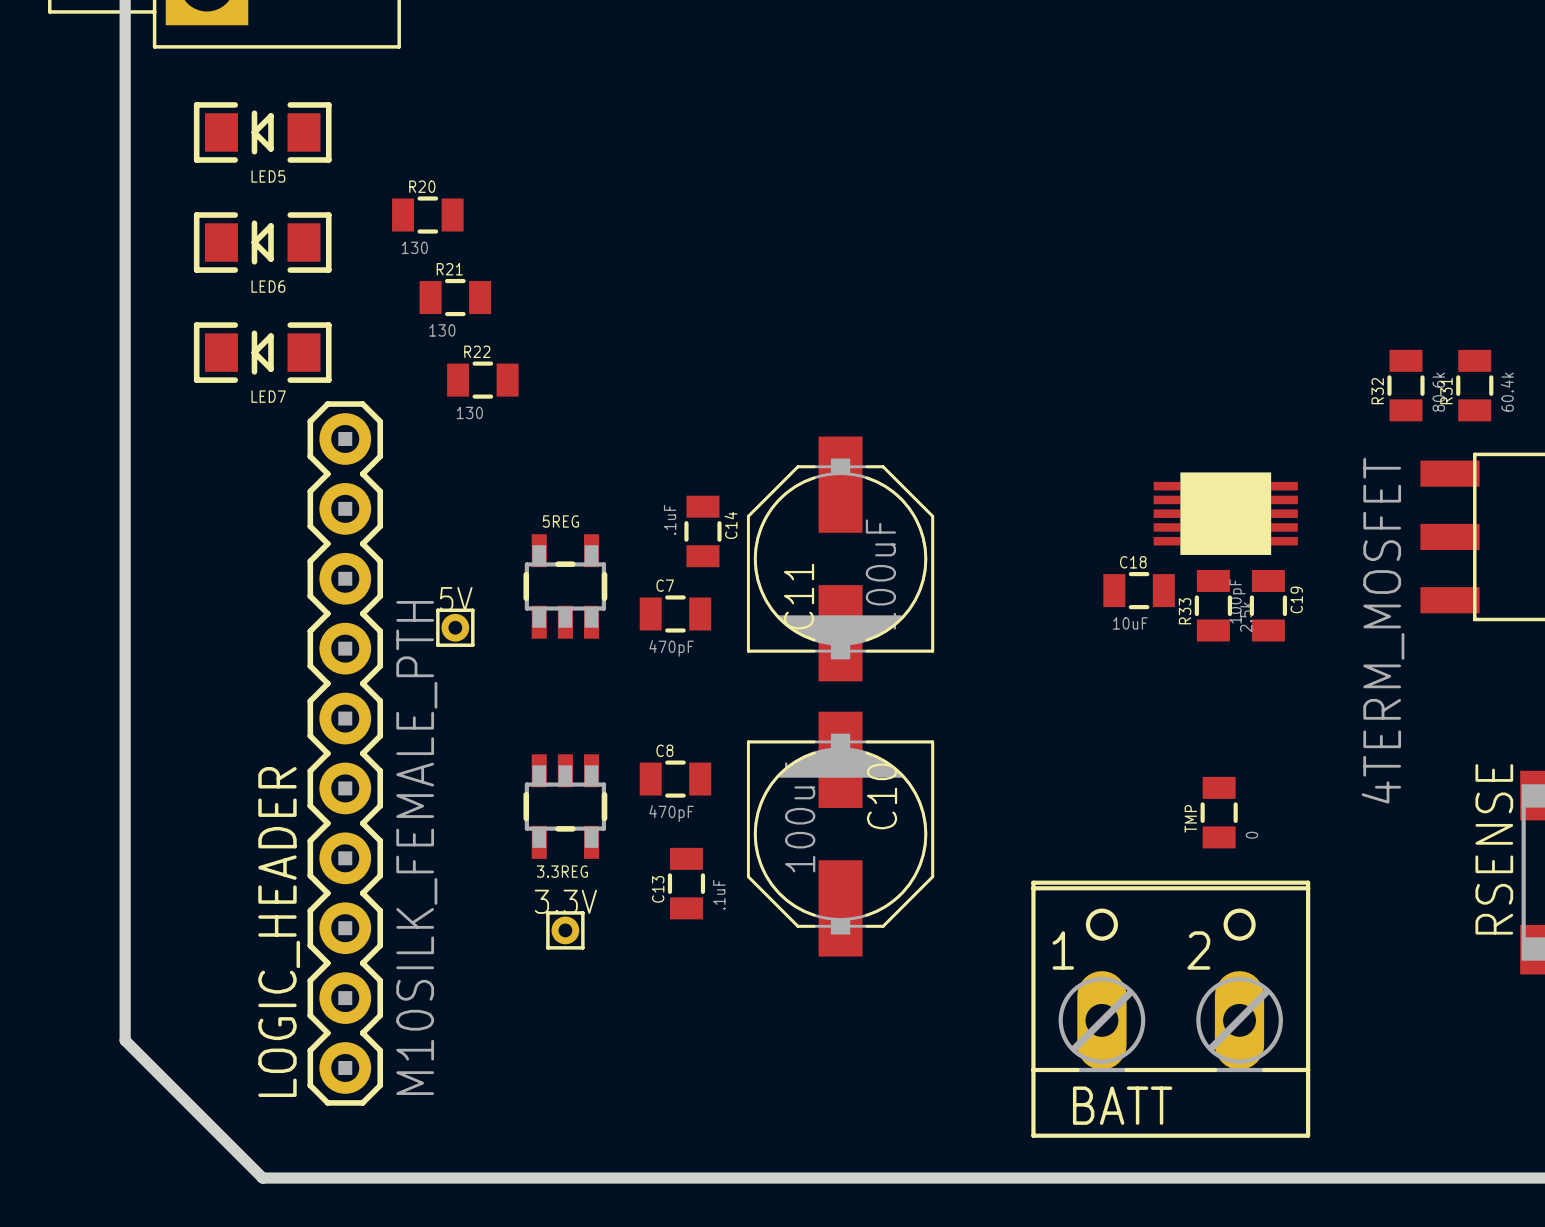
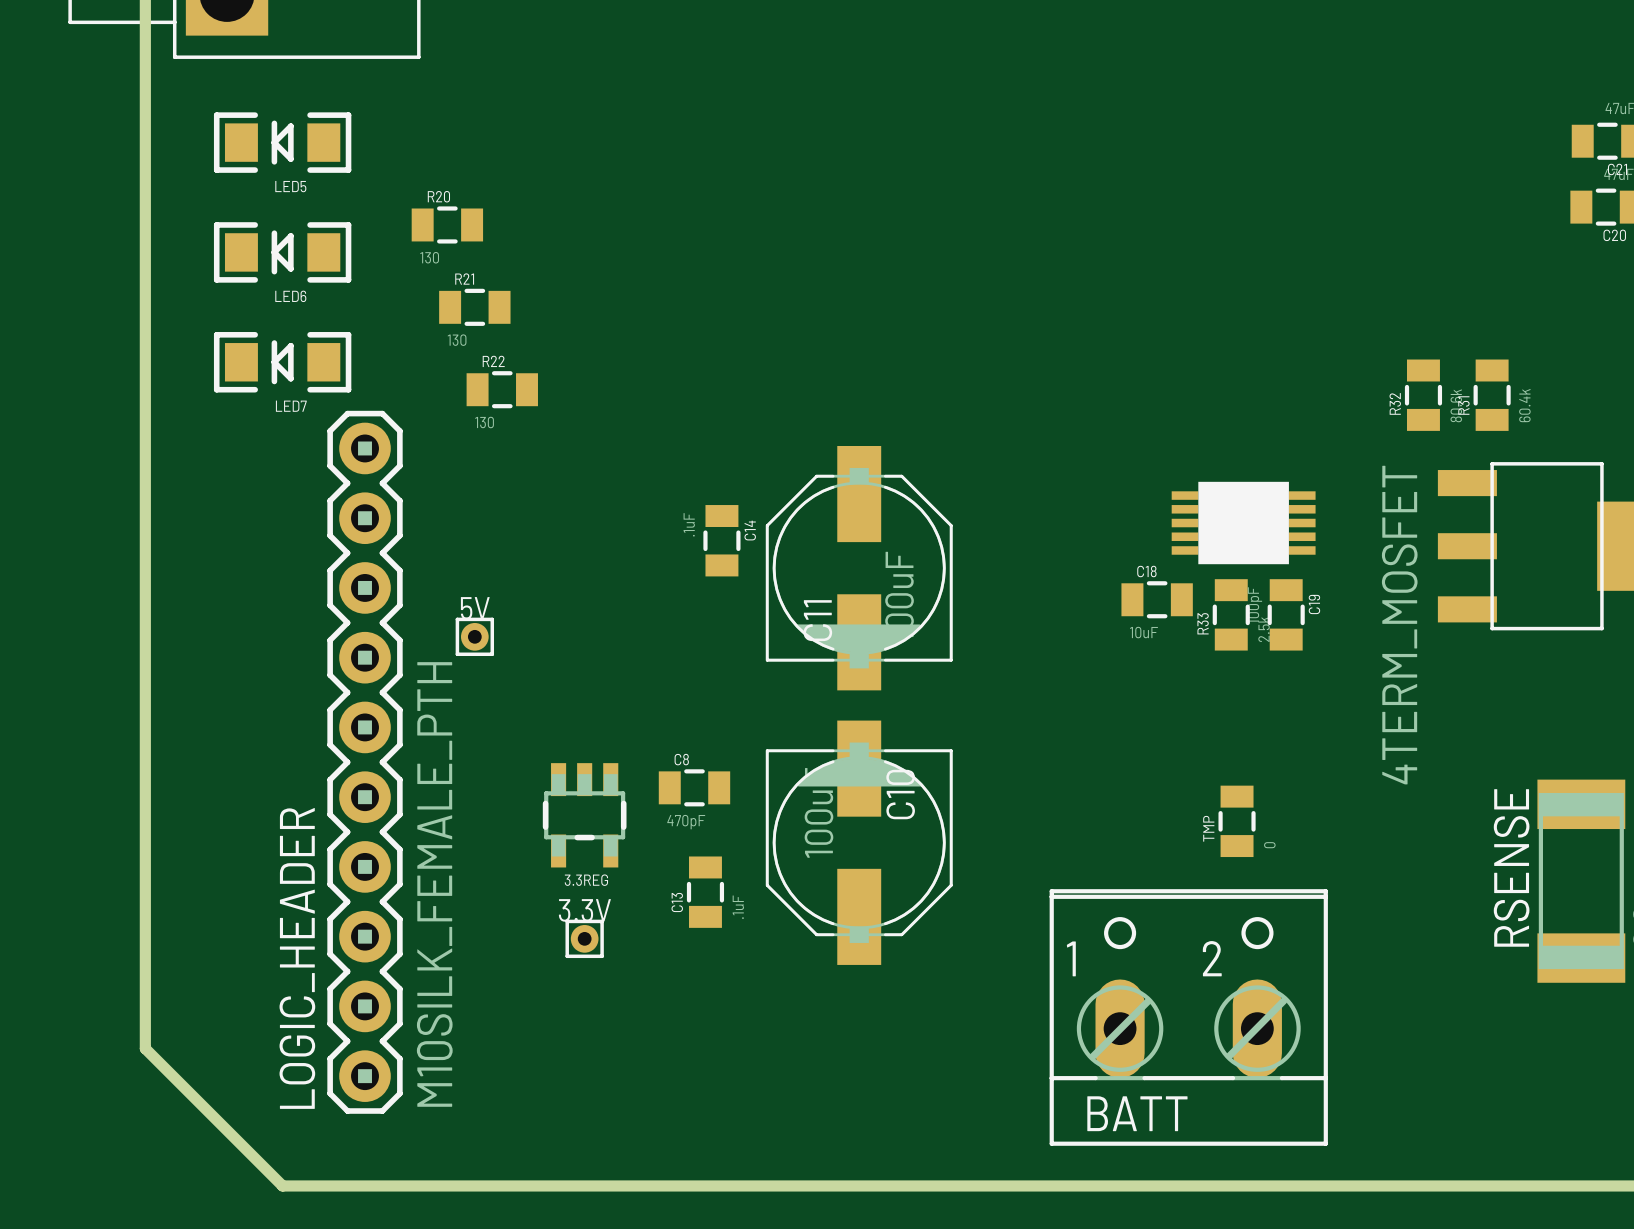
5REG: (565, 586) -> none
C7: 470pF (675, 613) -> none

